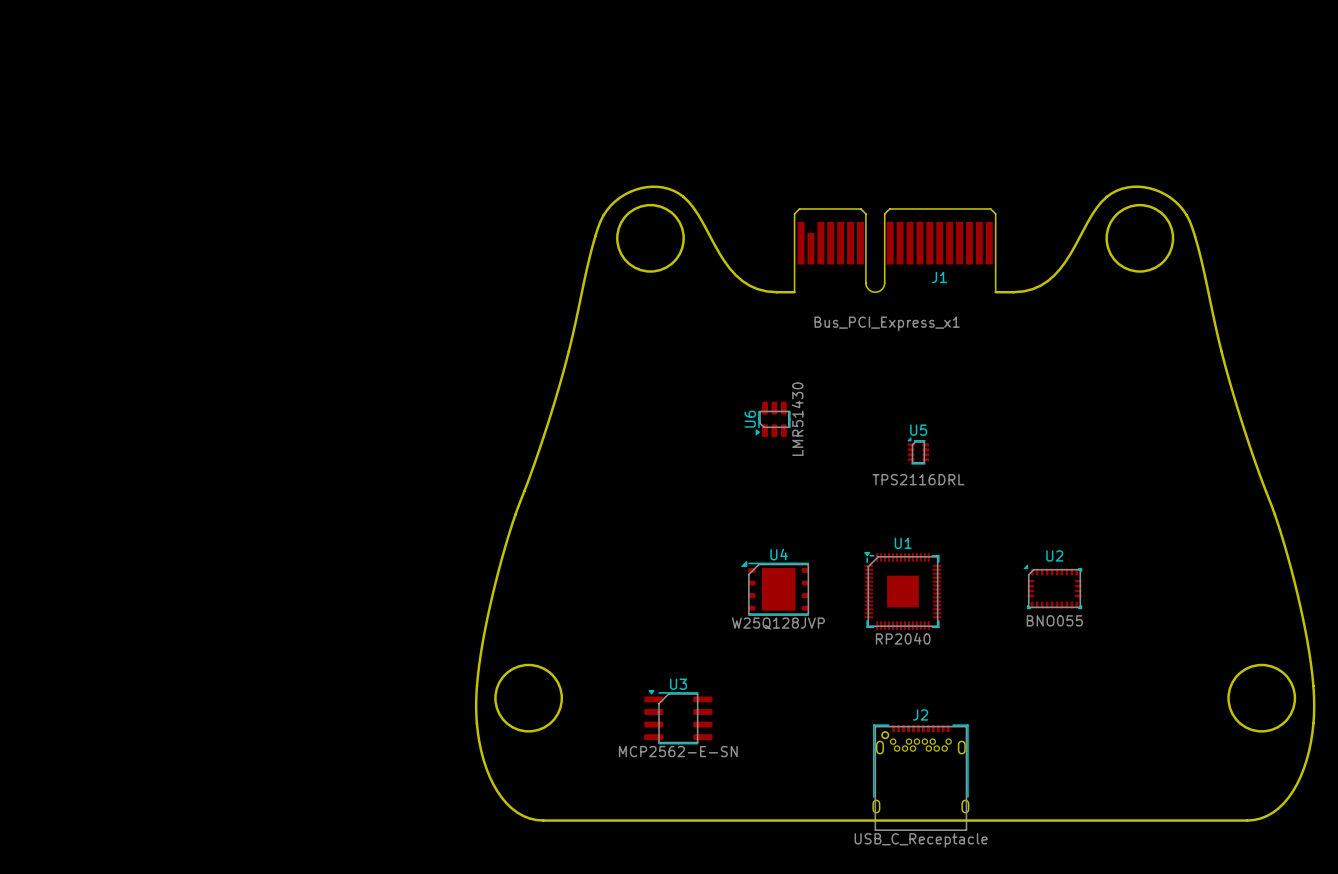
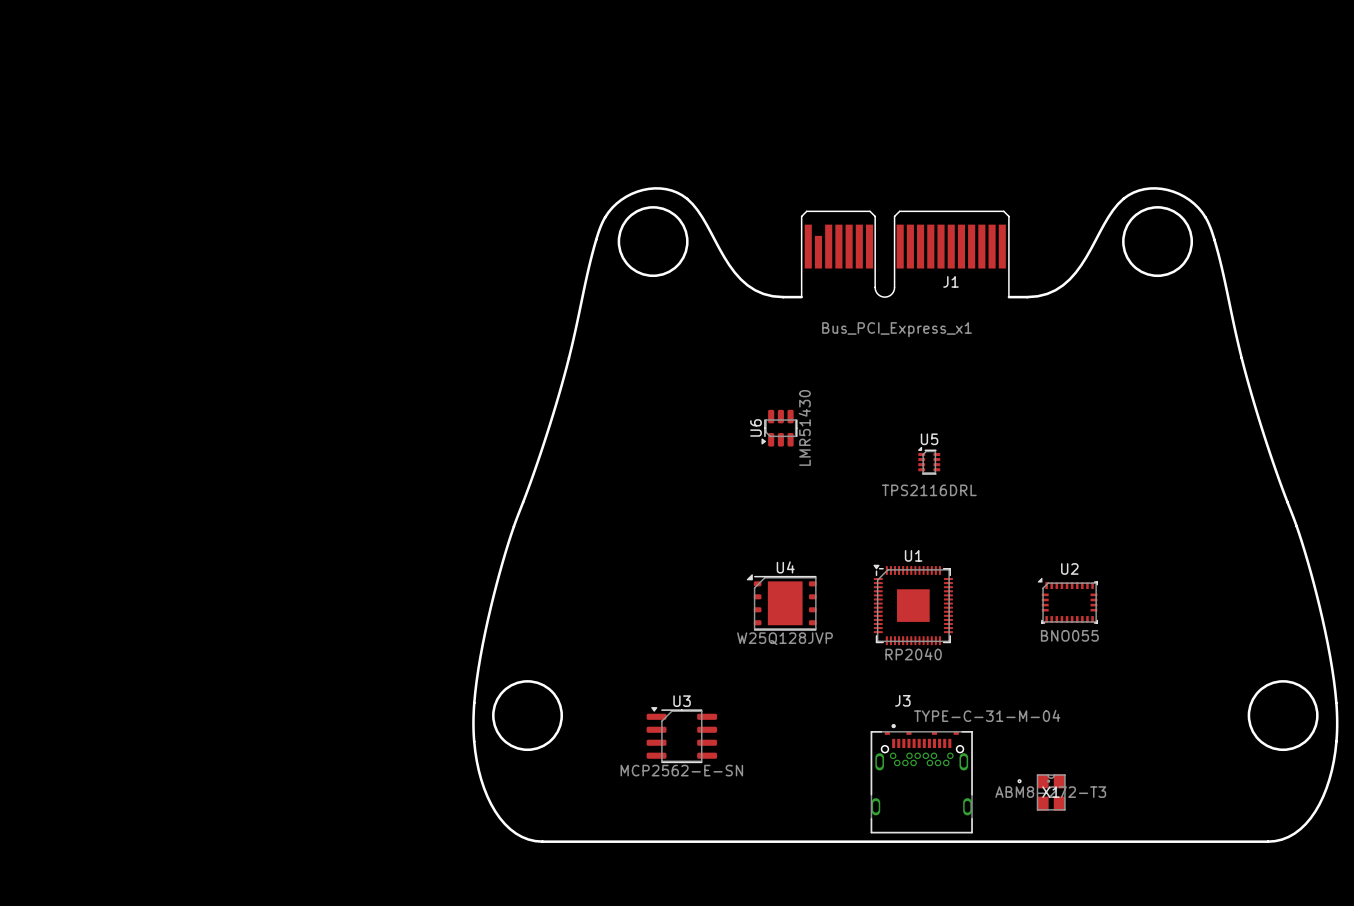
J3: none -> TYPE-C-31-M-04 (921, 778)
X1: none -> ABM8-272-T3 (1041, 792)
J2: USB_C_Receptacle (920, 777) -> none

